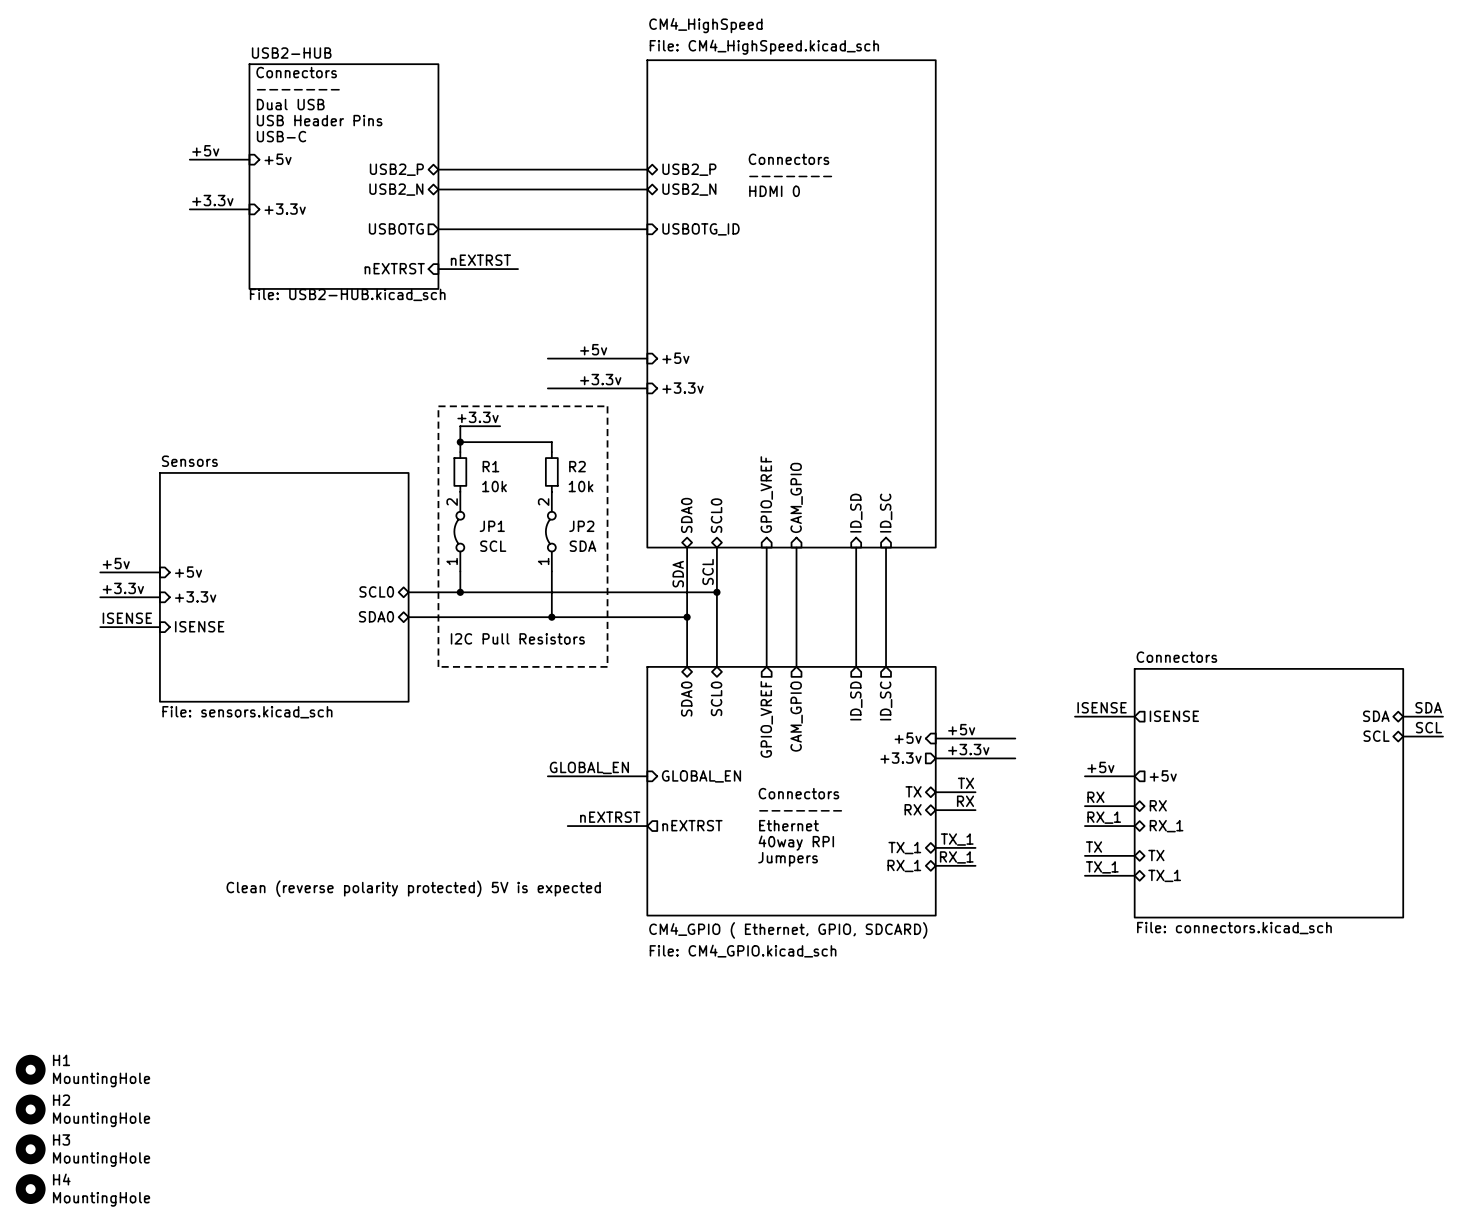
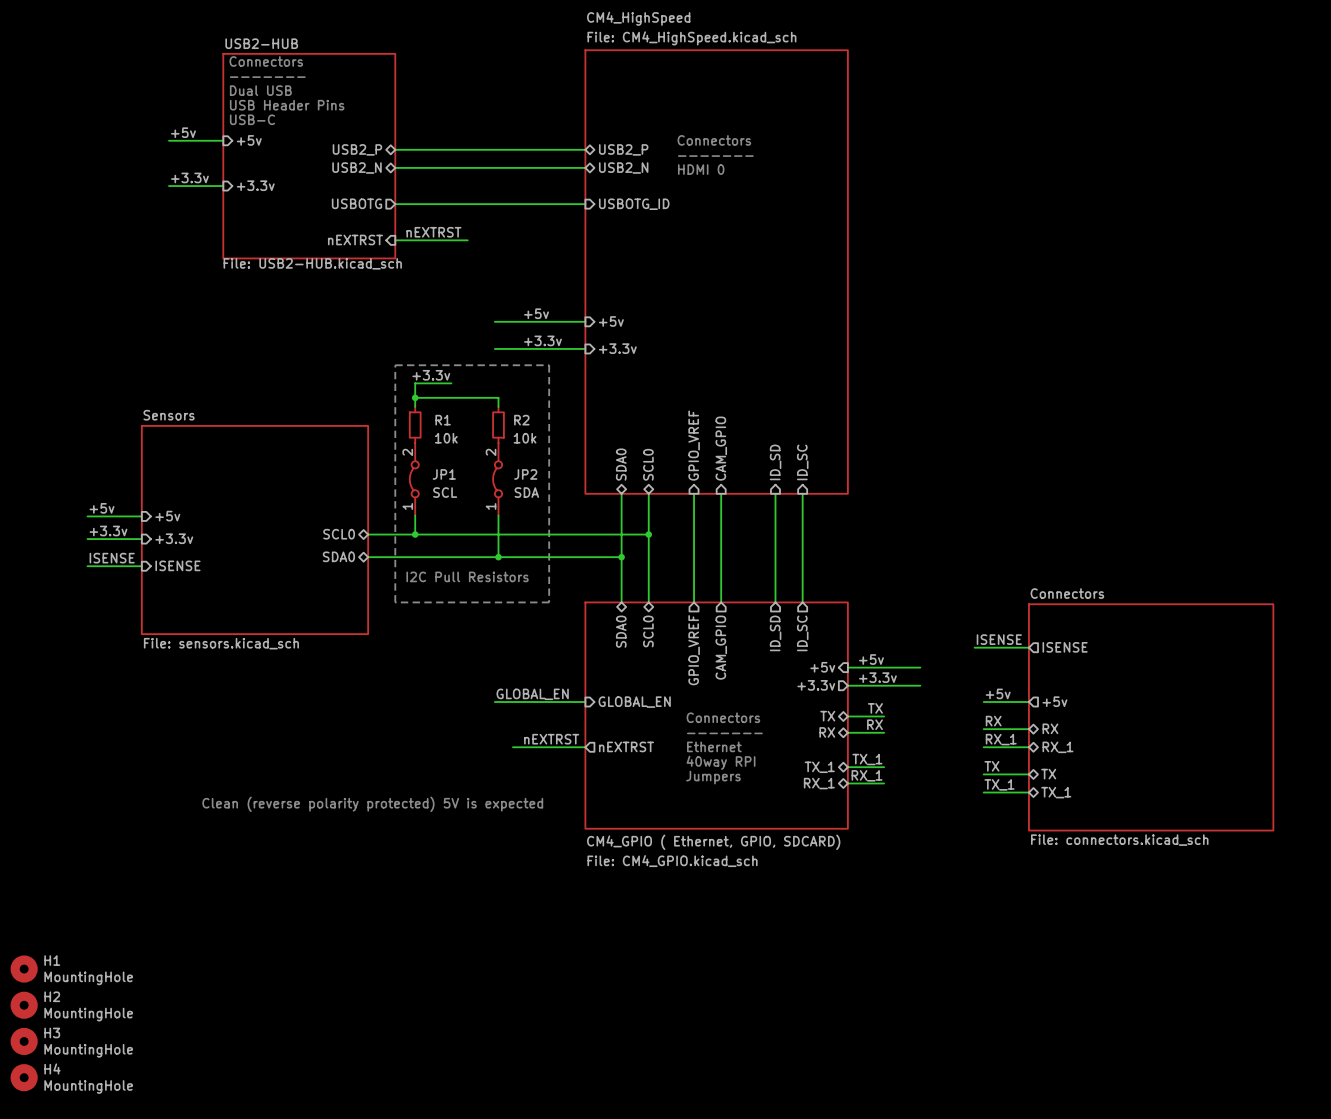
label: SCL (708, 571) -> none
label: SDA (678, 574) -> none
label: SDA (1428, 707) -> none
sheet pin: SDA (1376, 716) -> none
wire: (1403, 716) (1443, 716) -> none
label: SCL (1428, 727) -> none
sheet pin: SCL (1376, 736) -> none
wire: (1403, 736) (1443, 736) -> none

